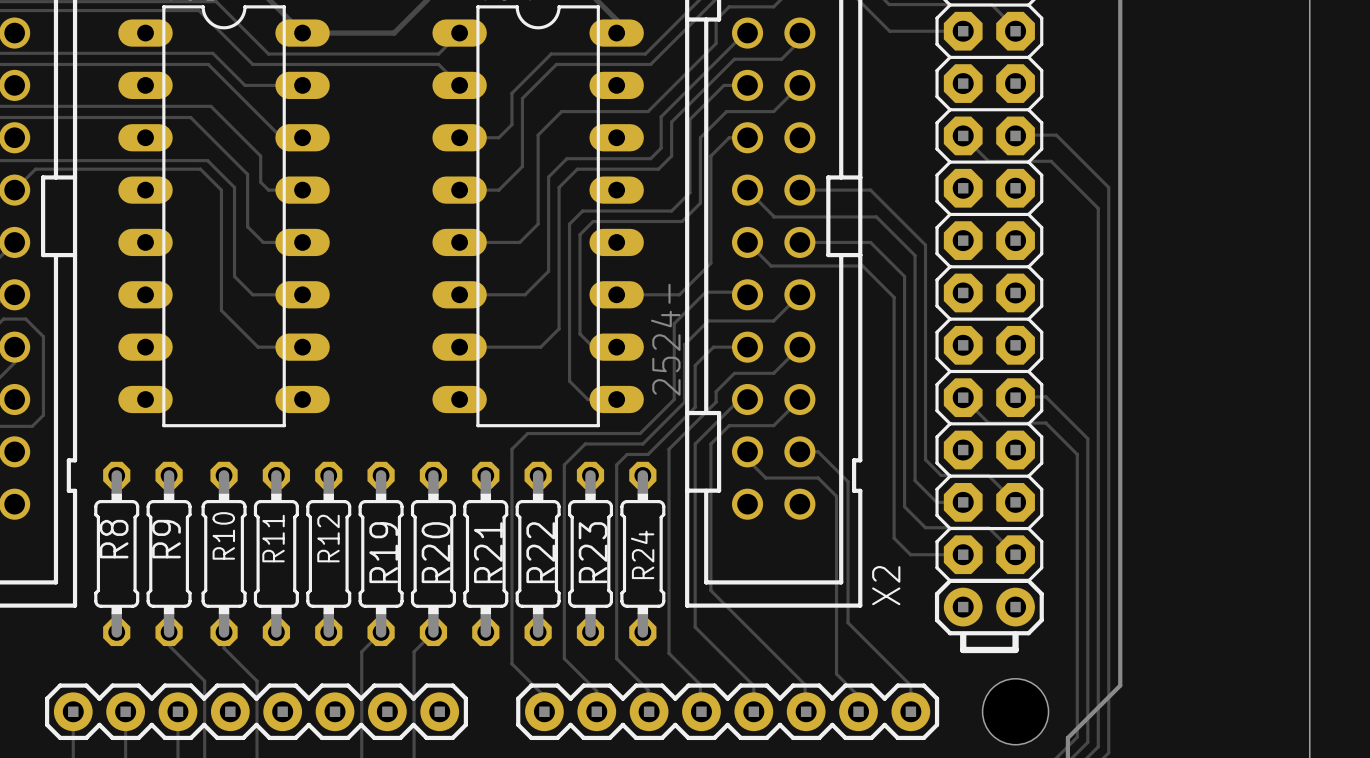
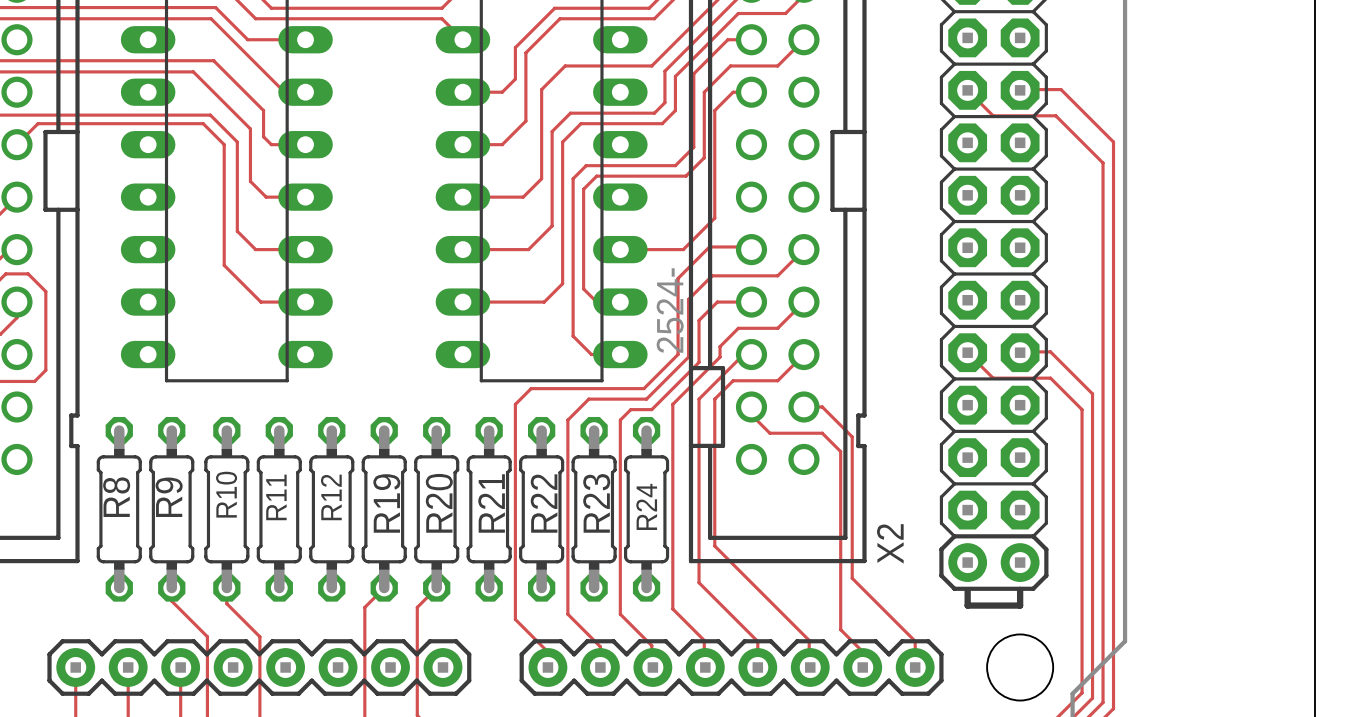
track: (747, 190) (773, 216) (876, 216) (915, 255) (915, 480) (936, 502) (963, 502) -> none
track: (799, 190) (870, 190) (925, 245) (925, 459) (941, 475) (988, 475) (1015, 502) -> none
track: (747, 242) (771, 266) (862, 266) (894, 297) (894, 538) (910, 554) (963, 554) -> none
track: (799, 242) (870, 242) (904, 276) (904, 506) (925, 527) (988, 527) (1015, 554) -> none

